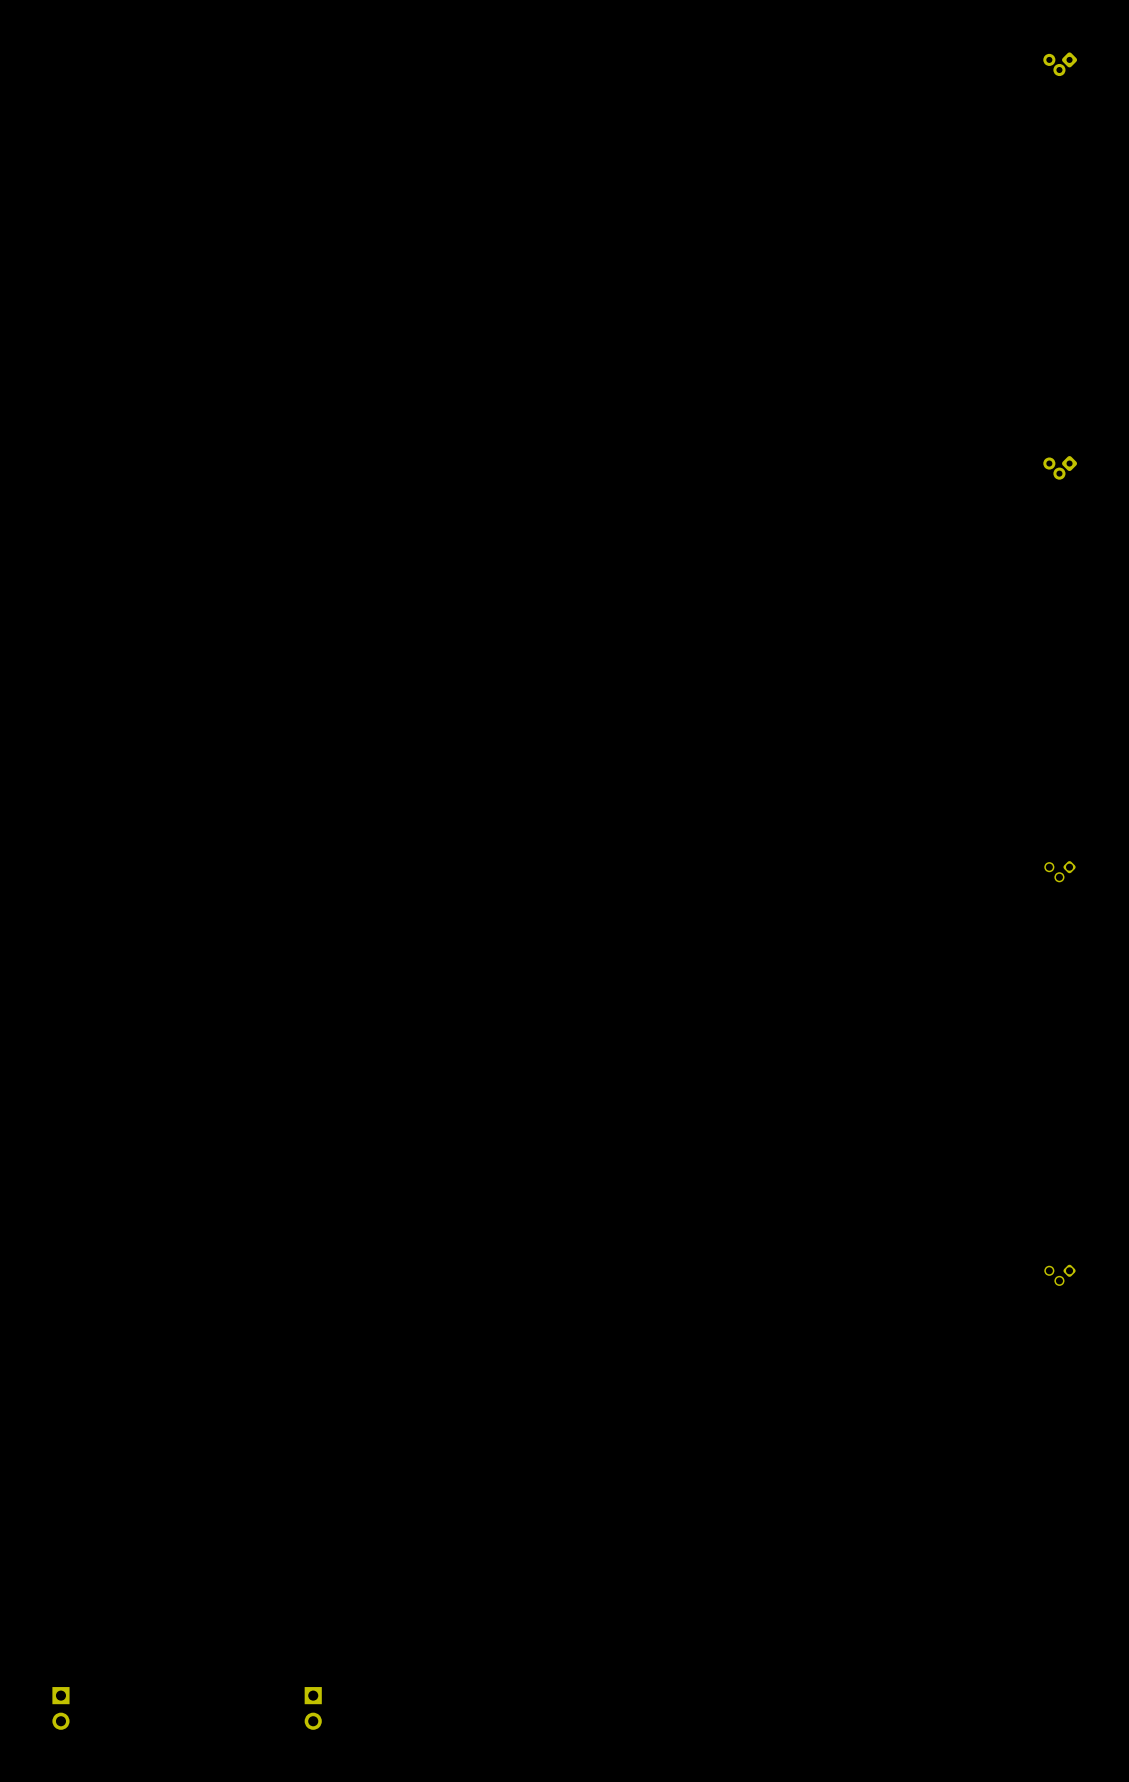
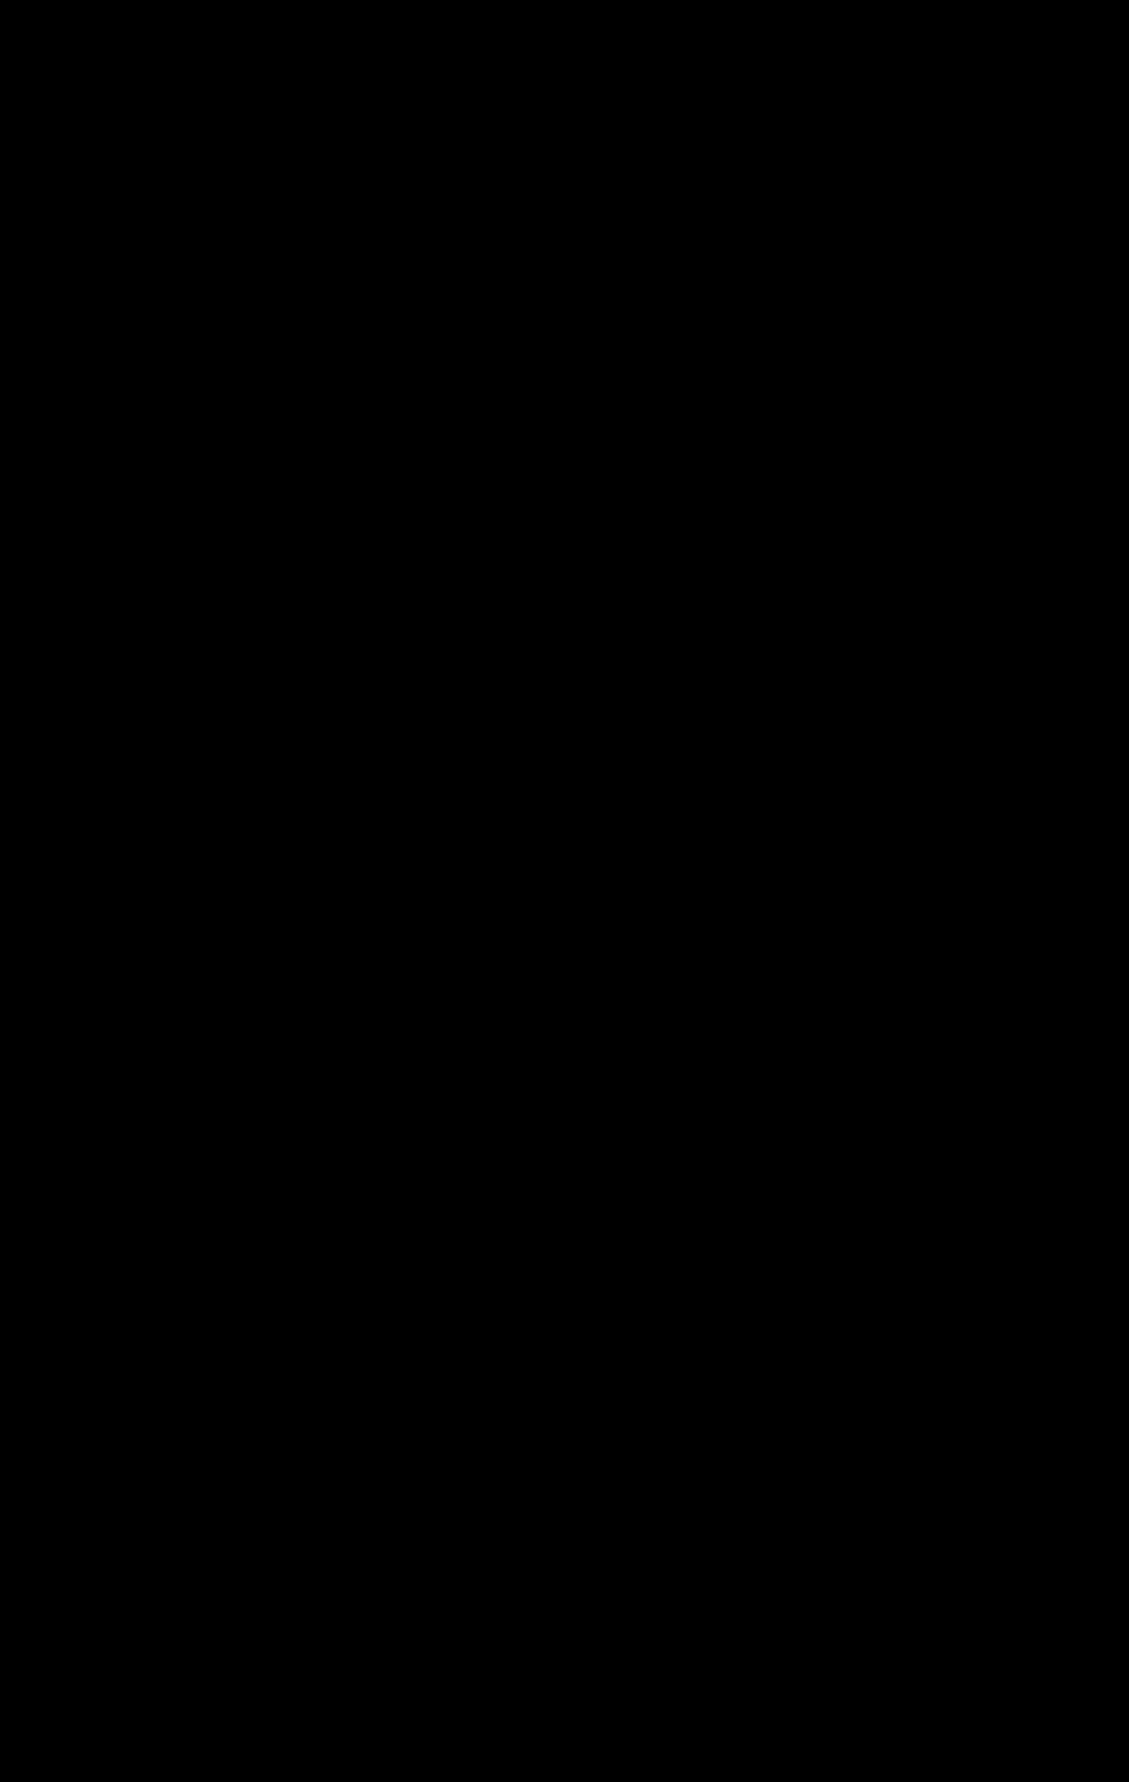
part: (1060, 64) -> none
part: (1060, 467) -> none
part: (1059, 871) -> none
part: (1059, 1275) -> none
part: (60, 1708) -> none
part: (313, 1708) -> none

